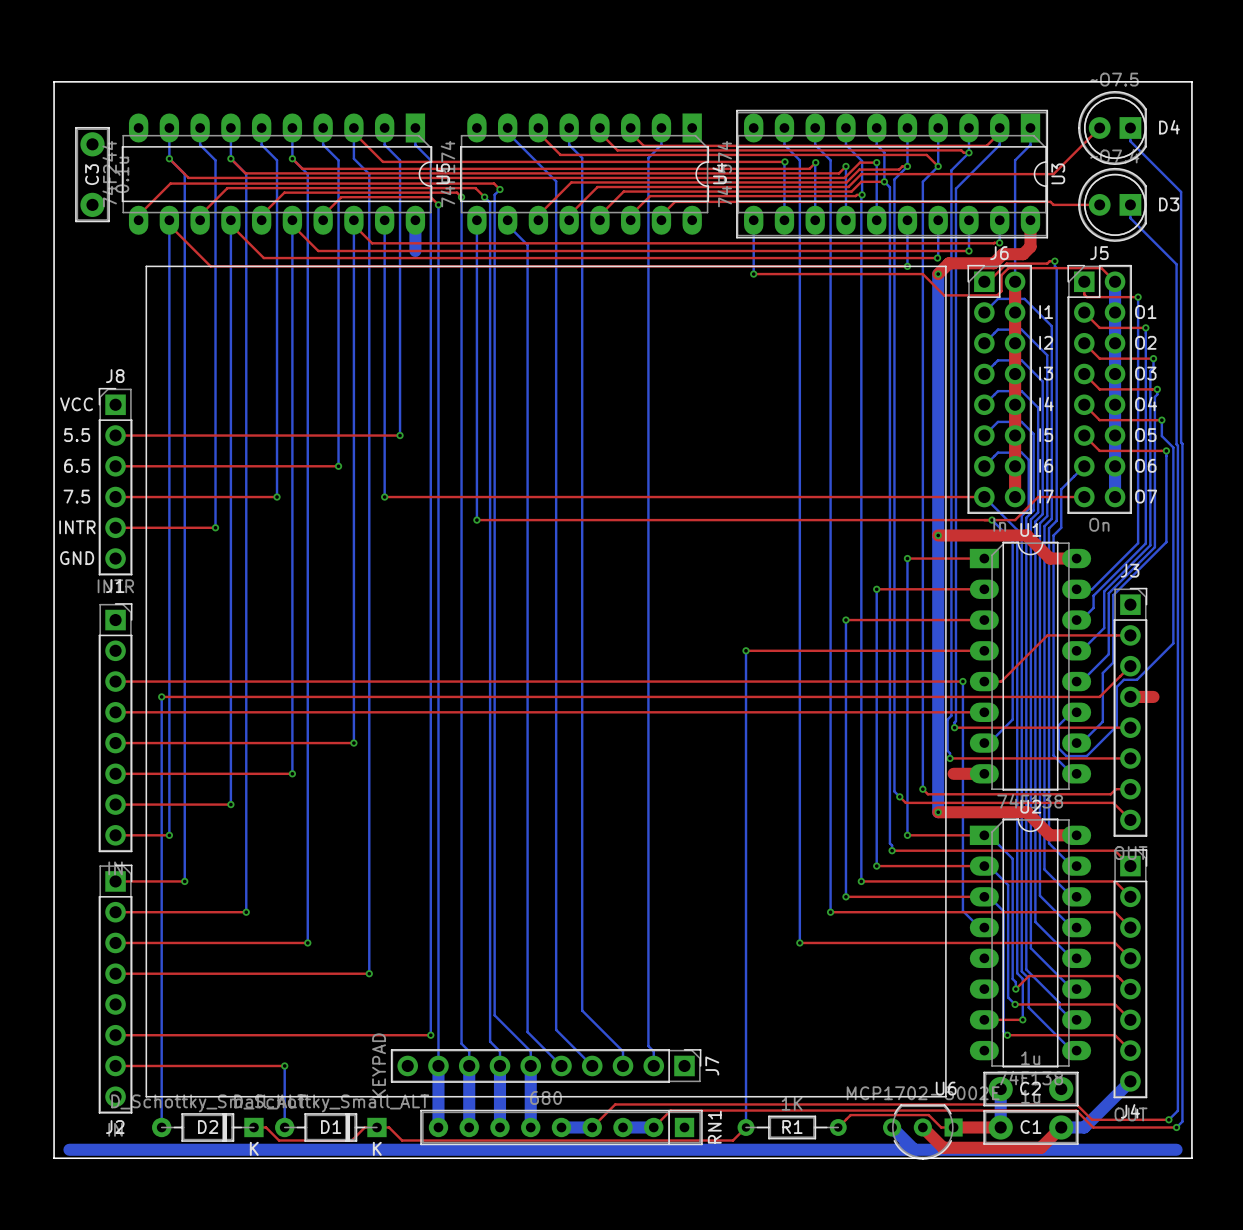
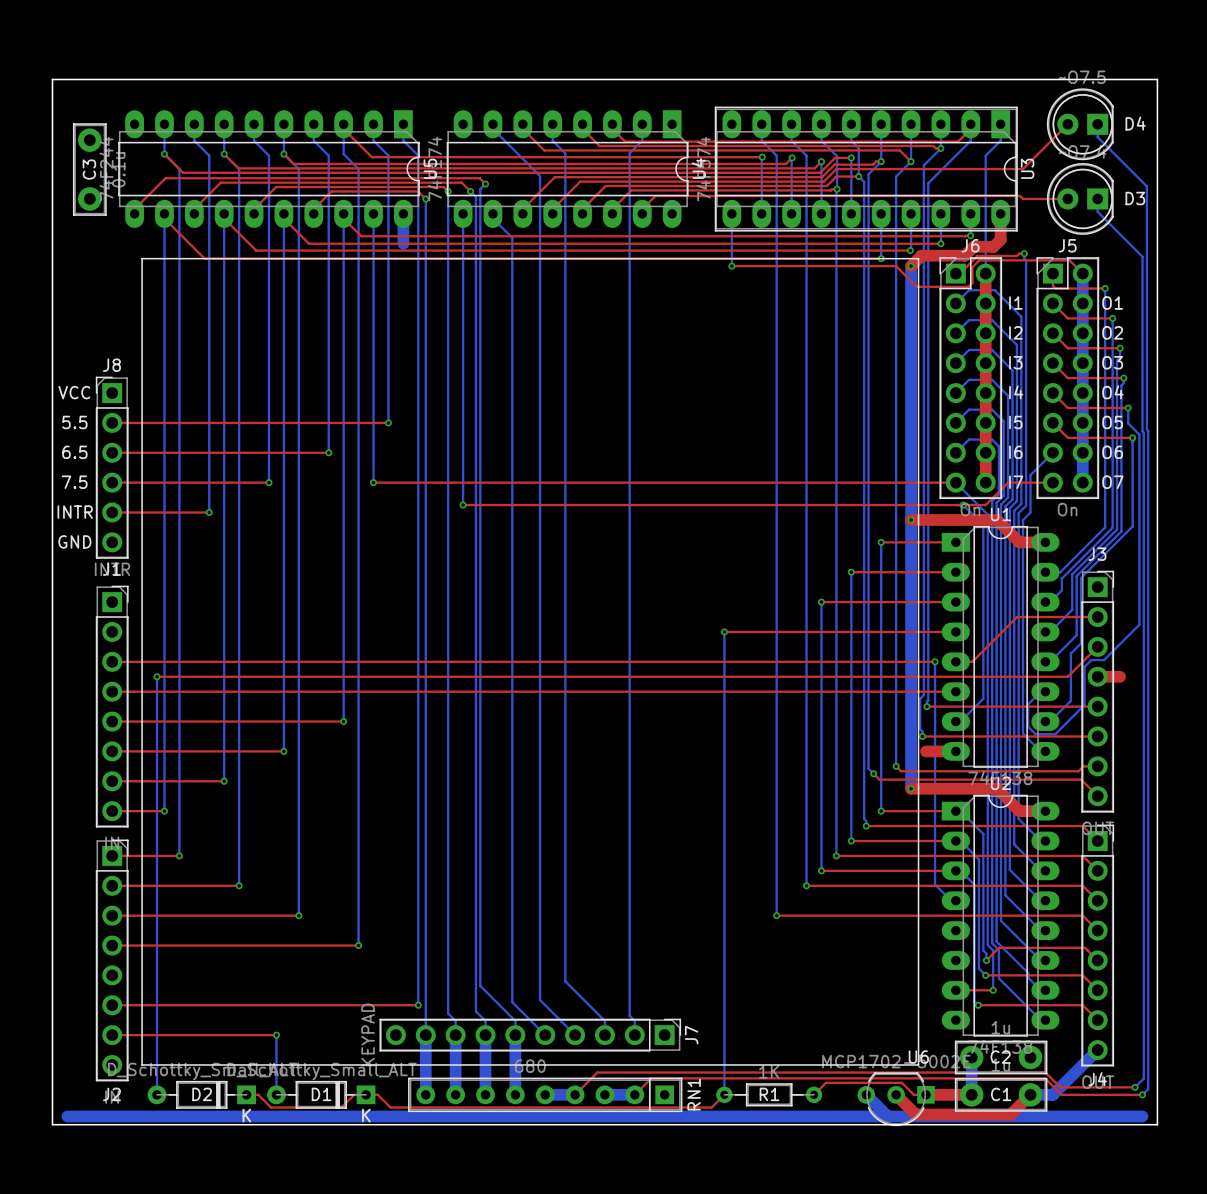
J6 value: In (999, 524) -> On (970, 509)

